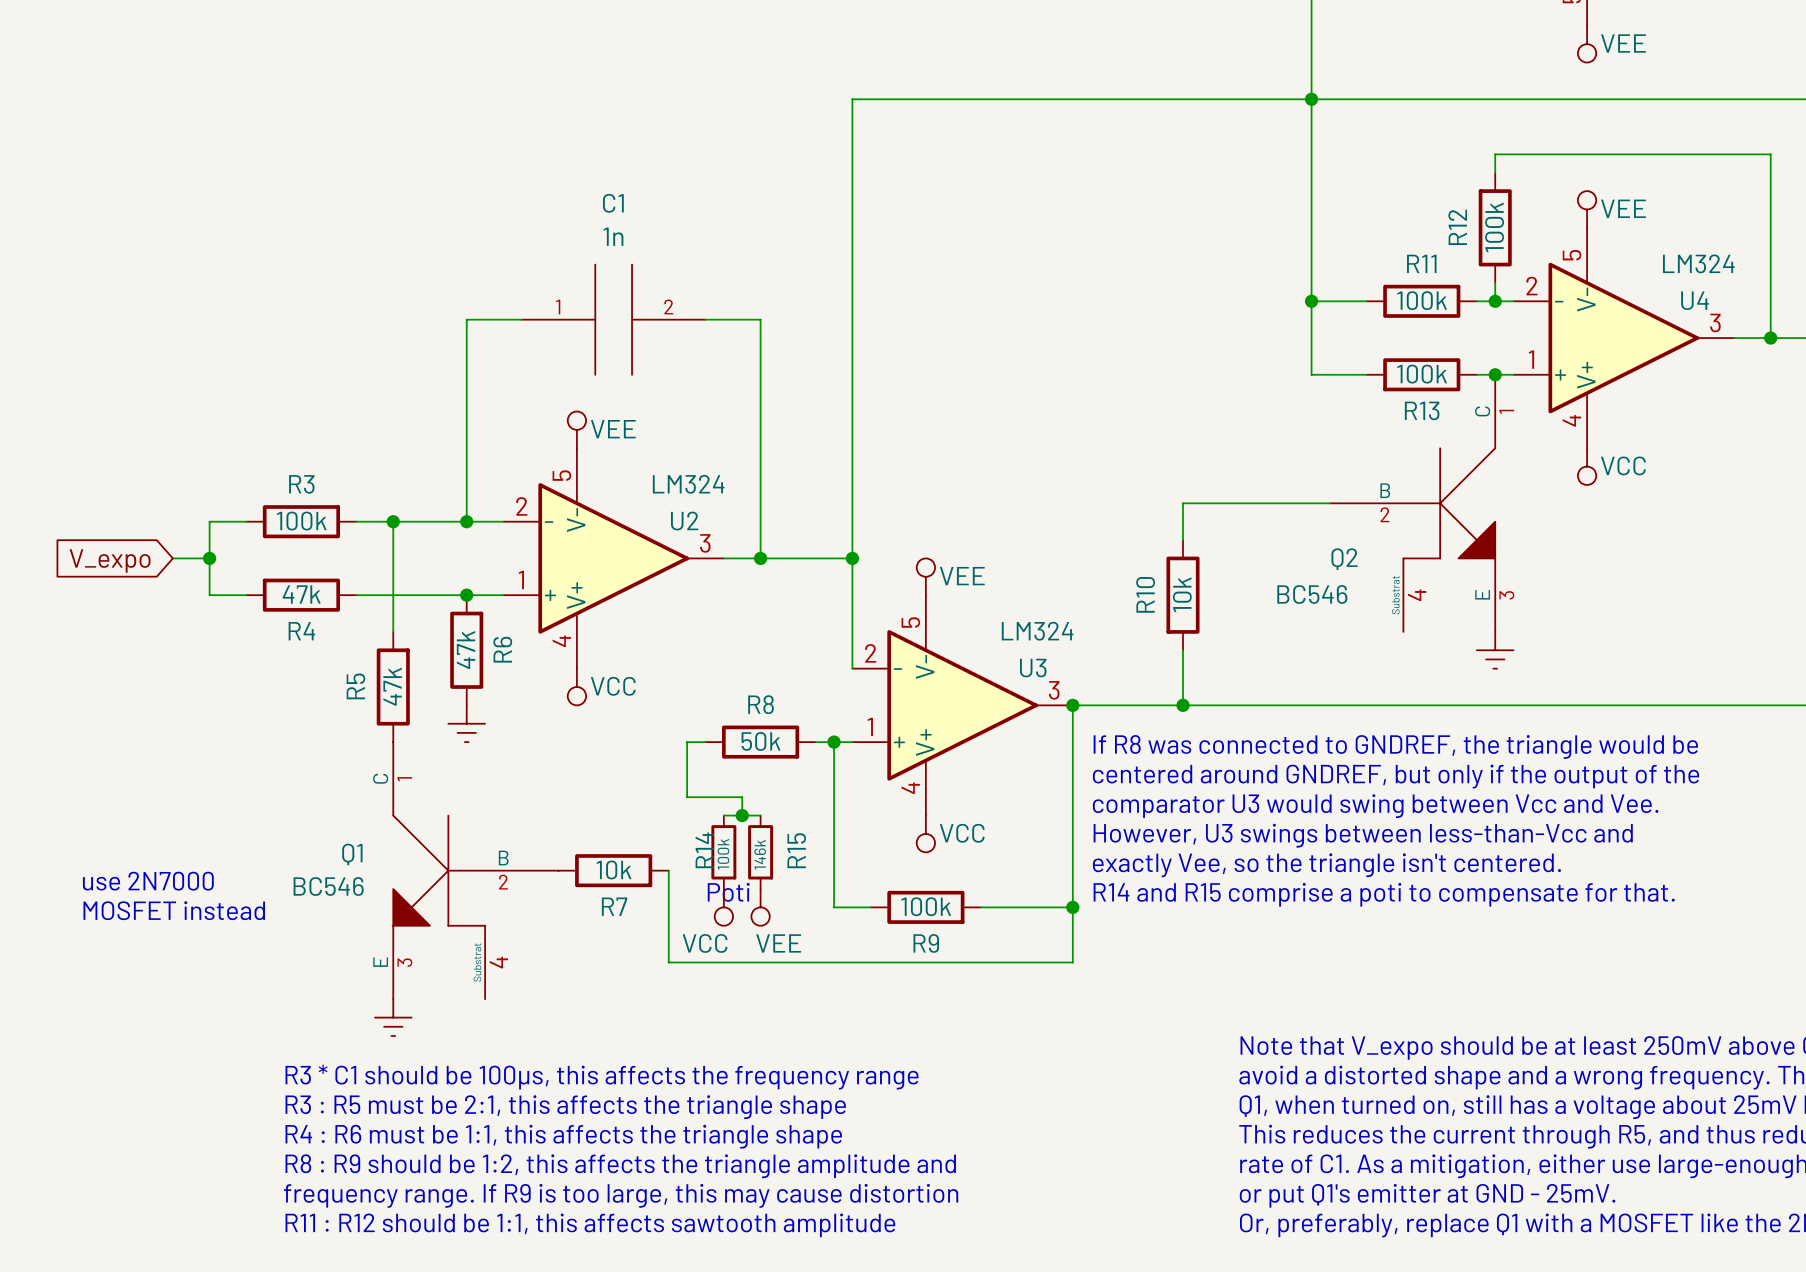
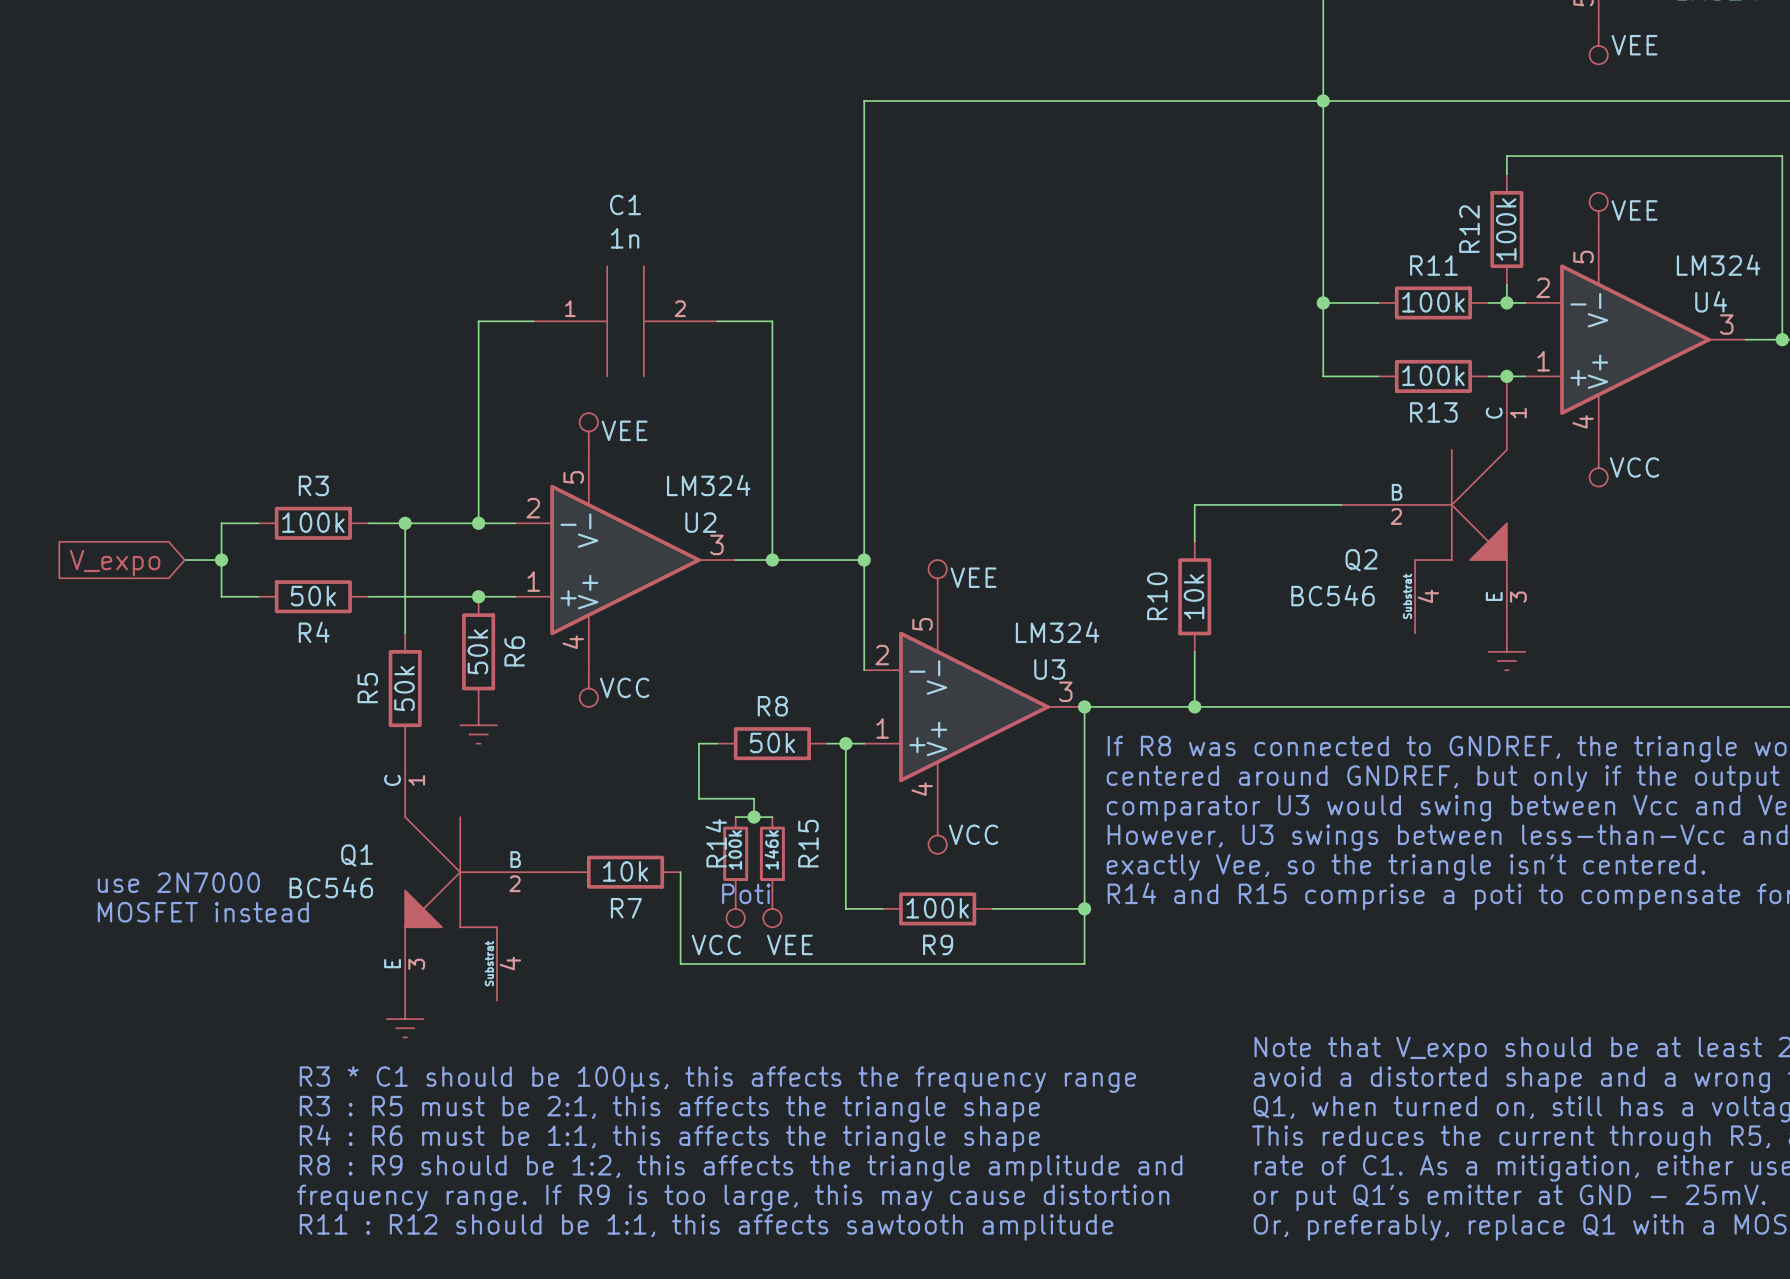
R4 value: 47k (301, 594) -> 50k (313, 596)
R6 value: 47k (466, 650) -> 50k (477, 651)
R5 value: 47k (392, 686) -> 50k (404, 688)

